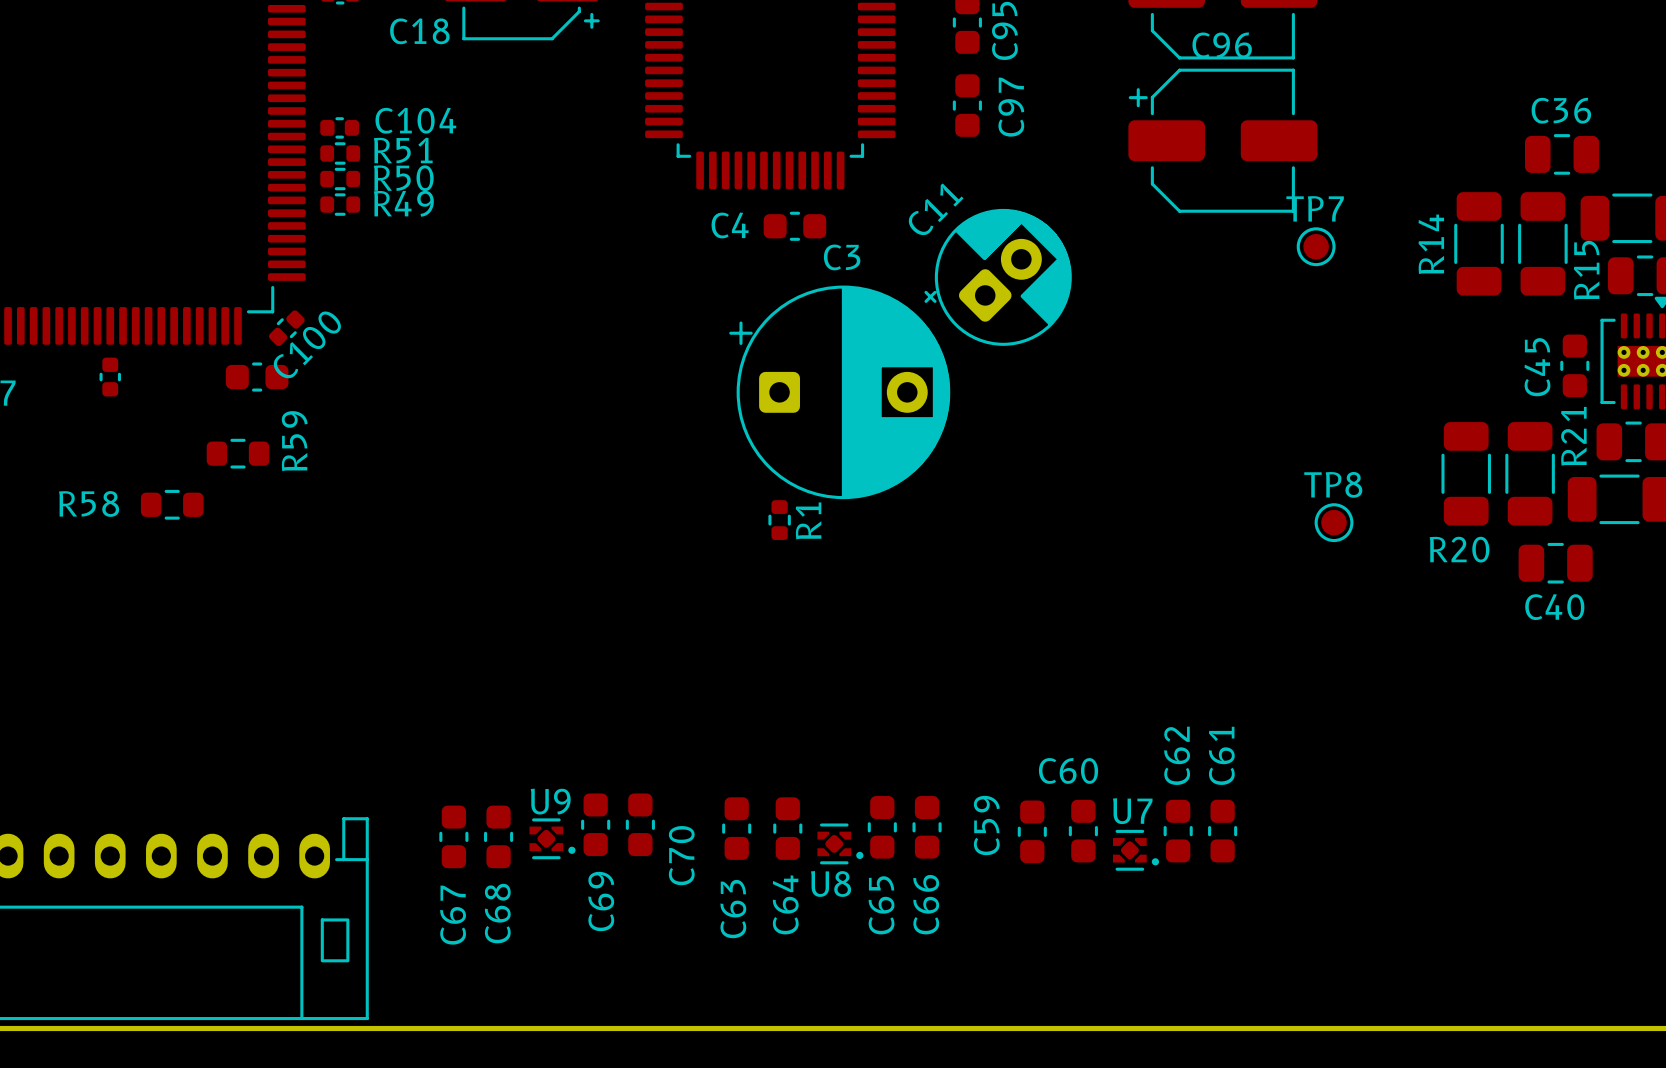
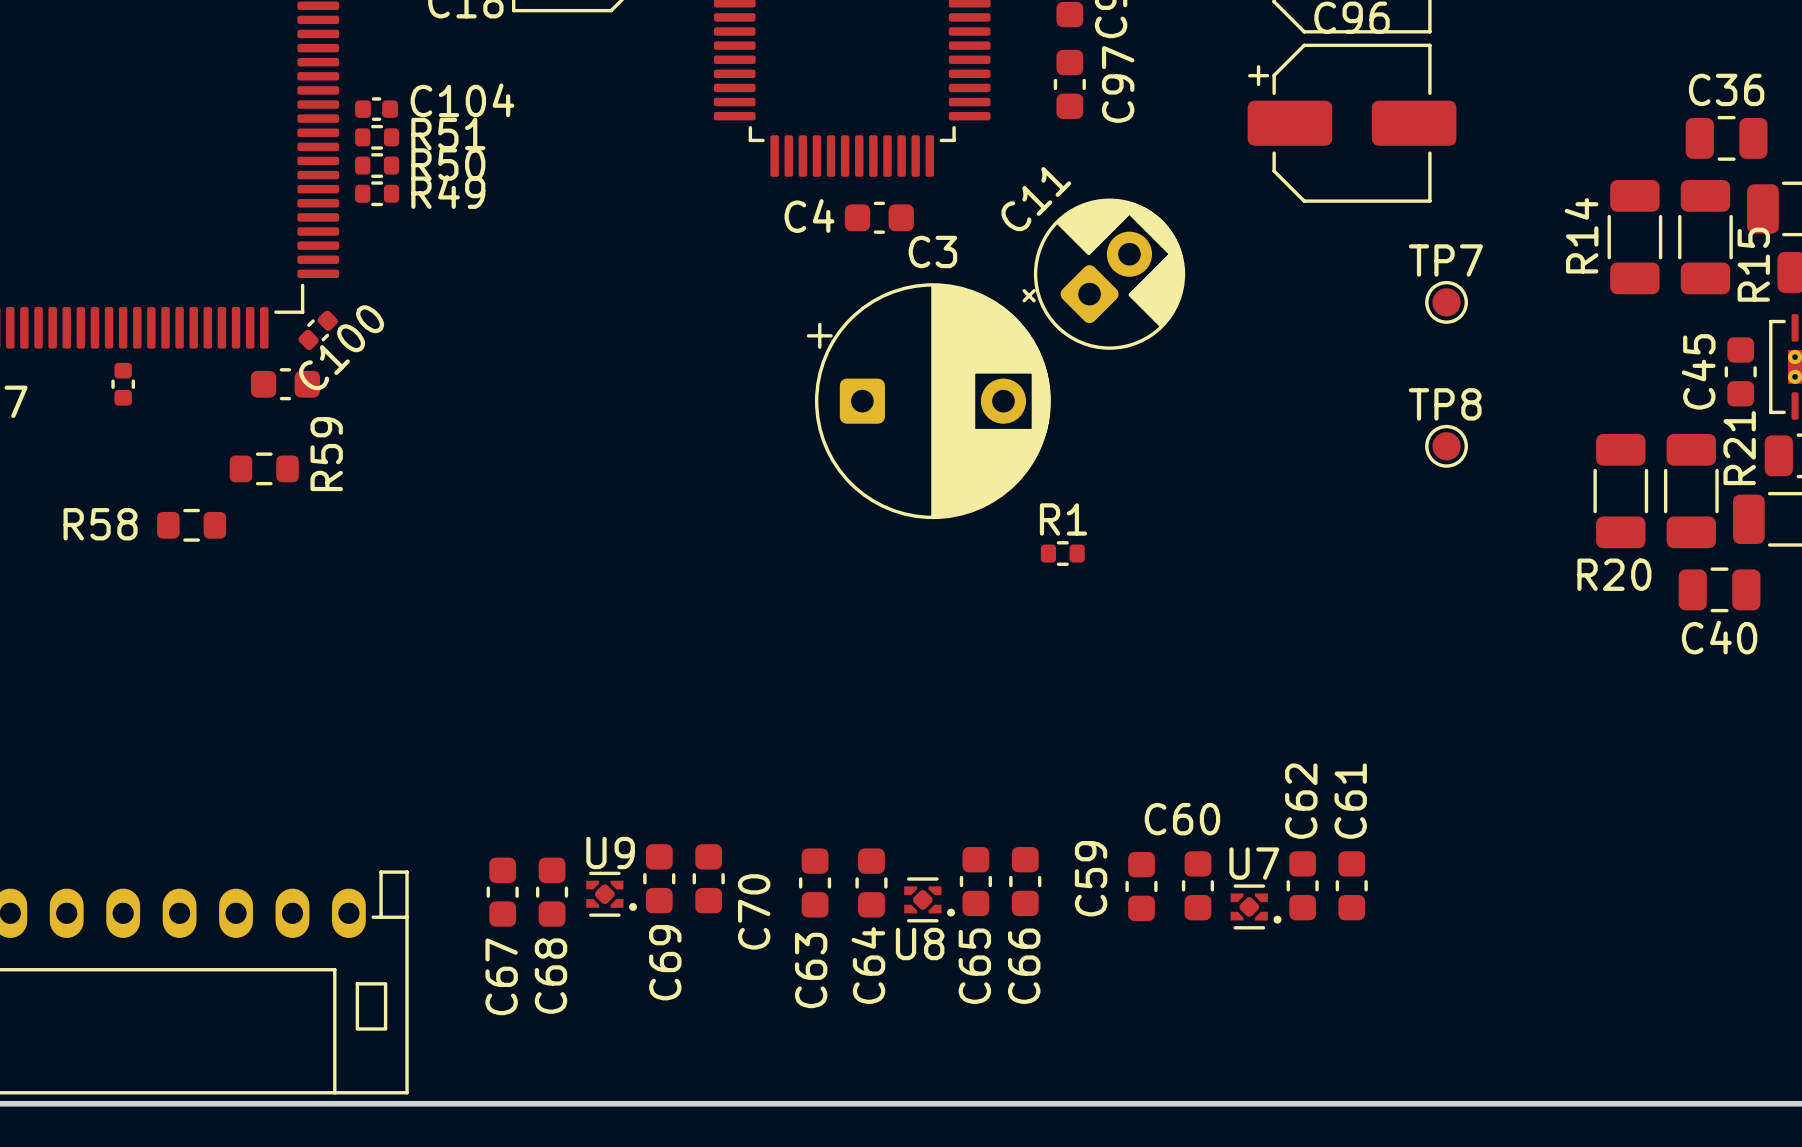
TP7 position: (1316, 246) -> (1446, 302)
R1 rotation: 0° (779, 520) -> 90° clockwise (1062, 553)
R1 position: (779, 520) -> (1062, 553)
TP8 position: (1334, 522) -> (1446, 446)

